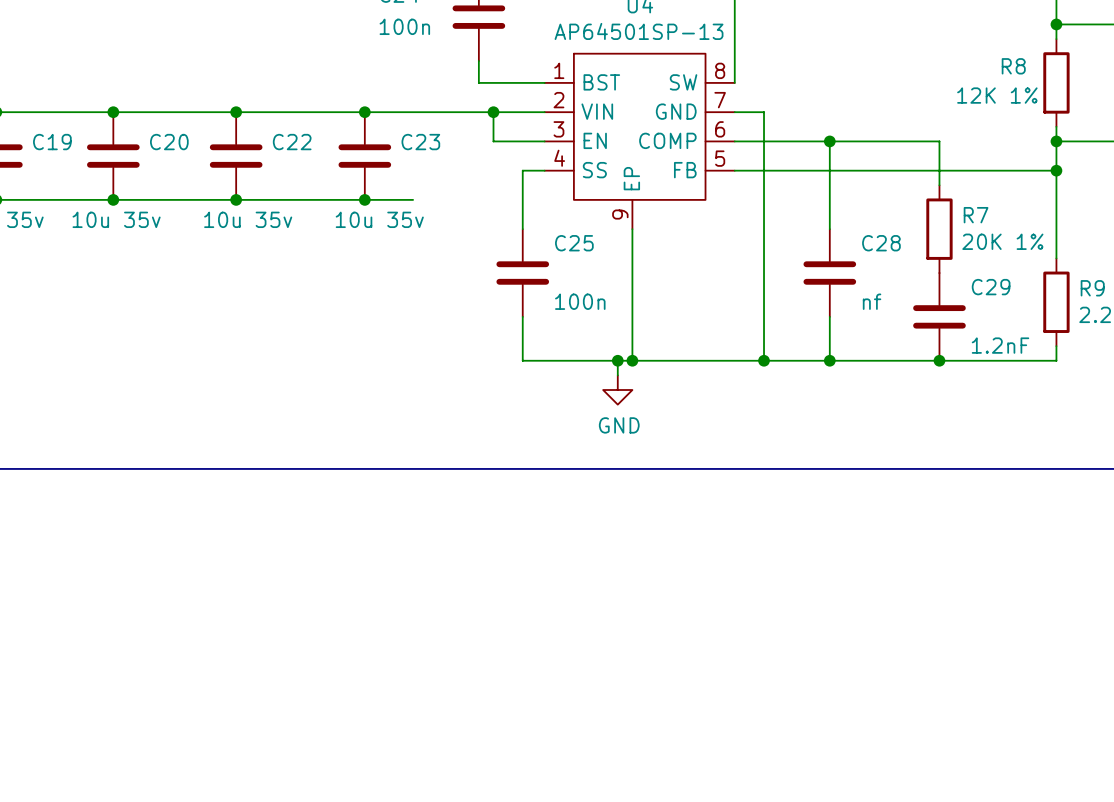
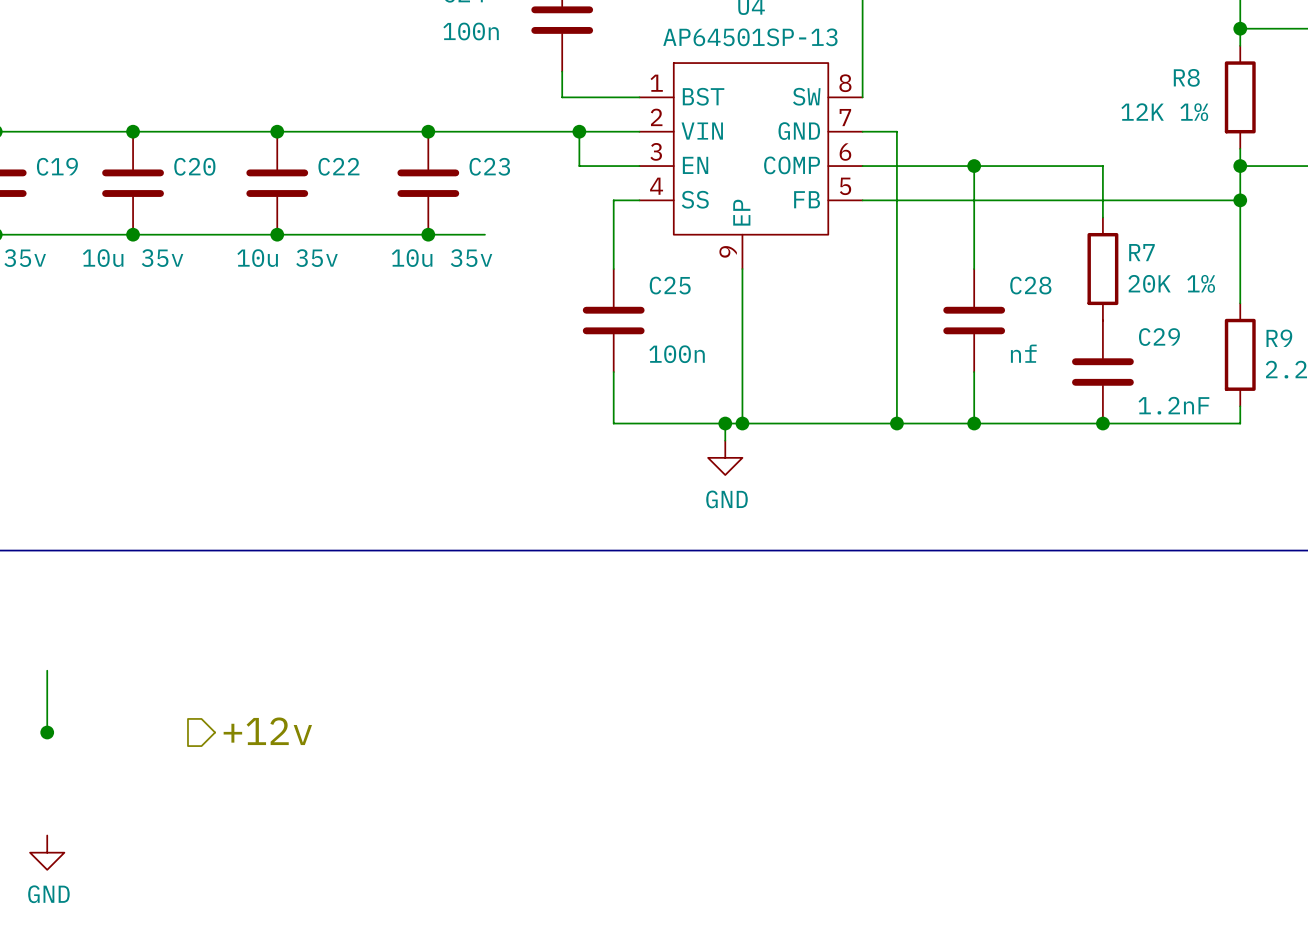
wire: none -> (47, 670) (47, 732)
junction: none -> (47, 732)
hierarchical label: none -> +12v (267, 731)
power symbol: none -> GND (47, 852)

